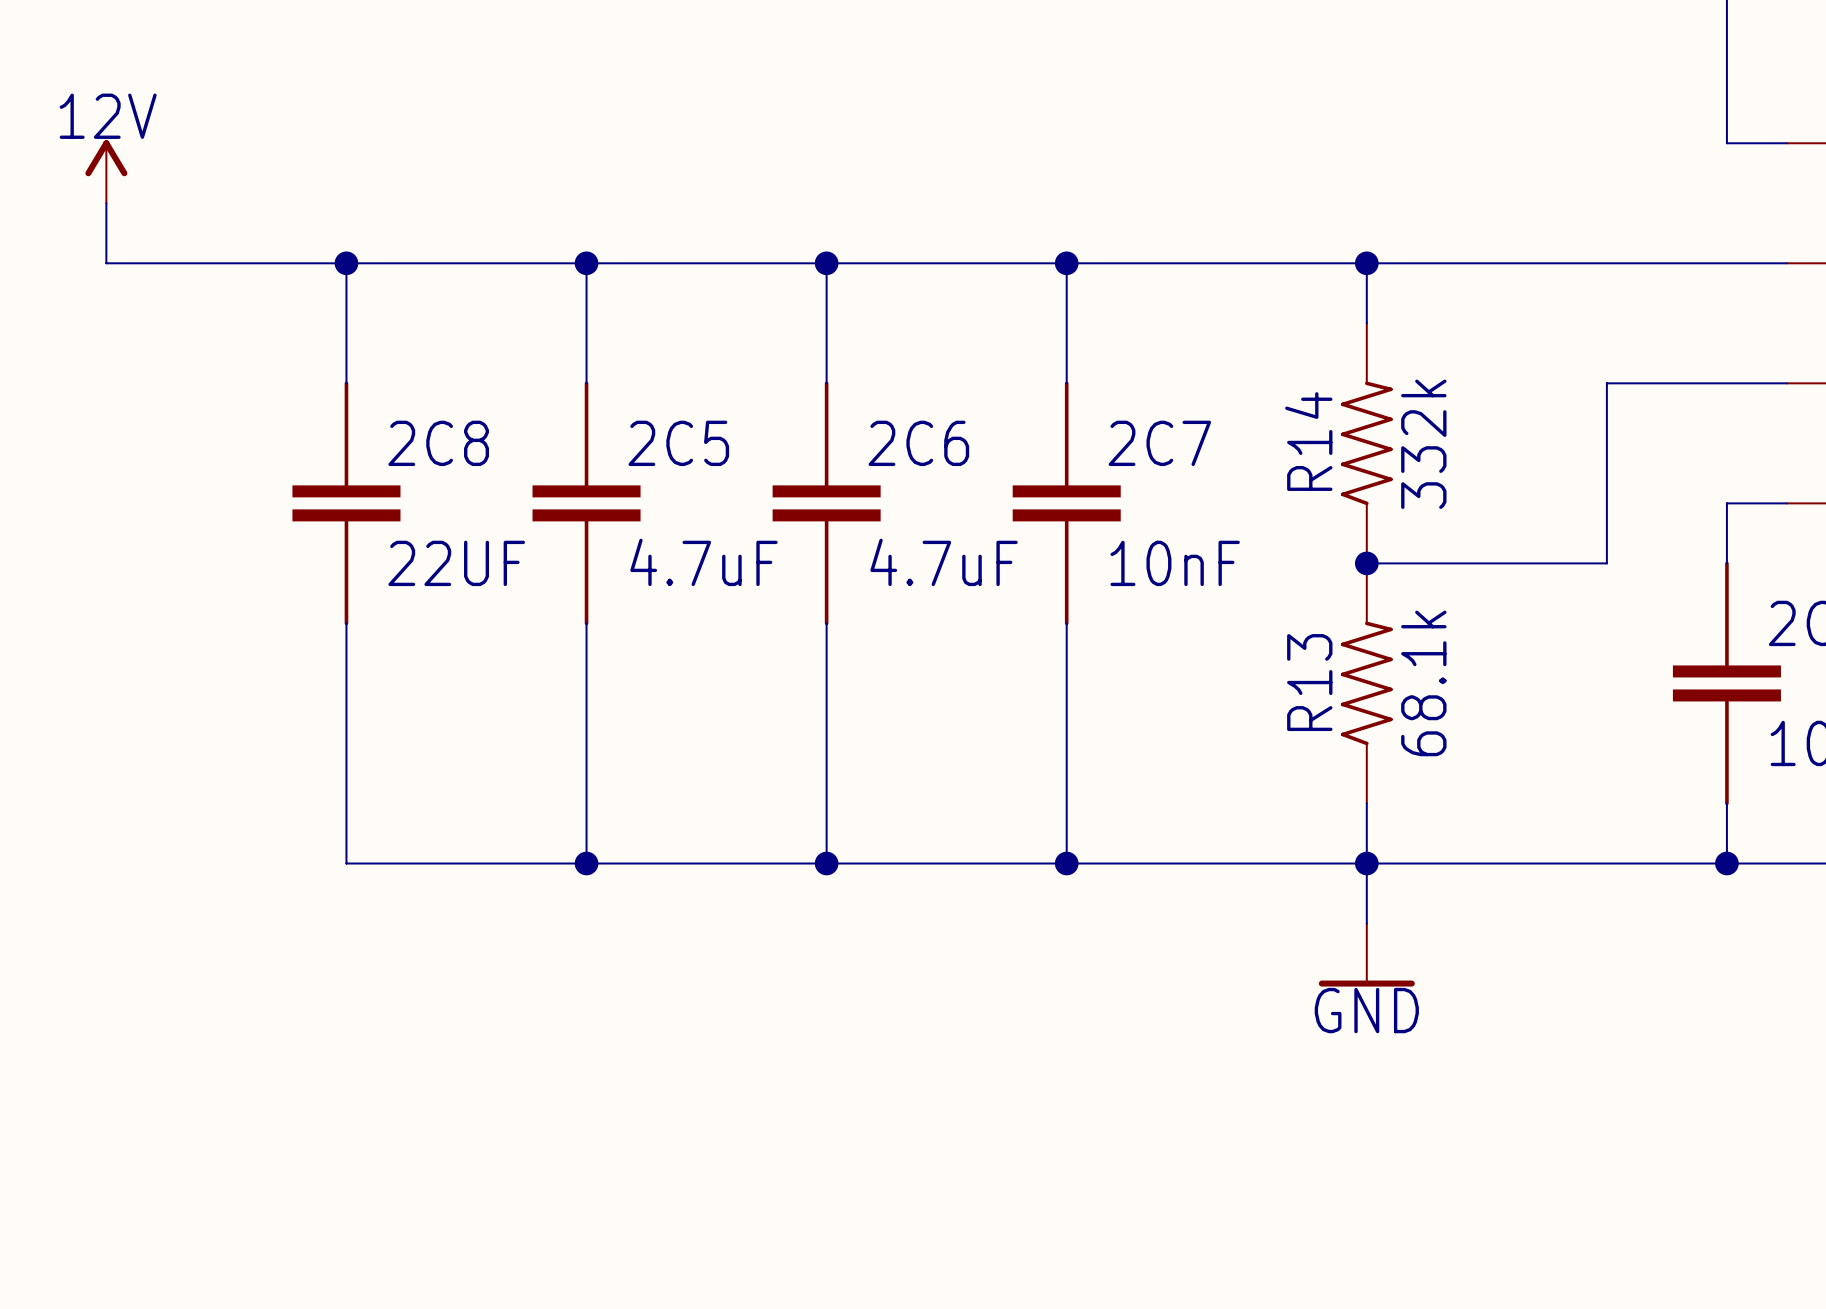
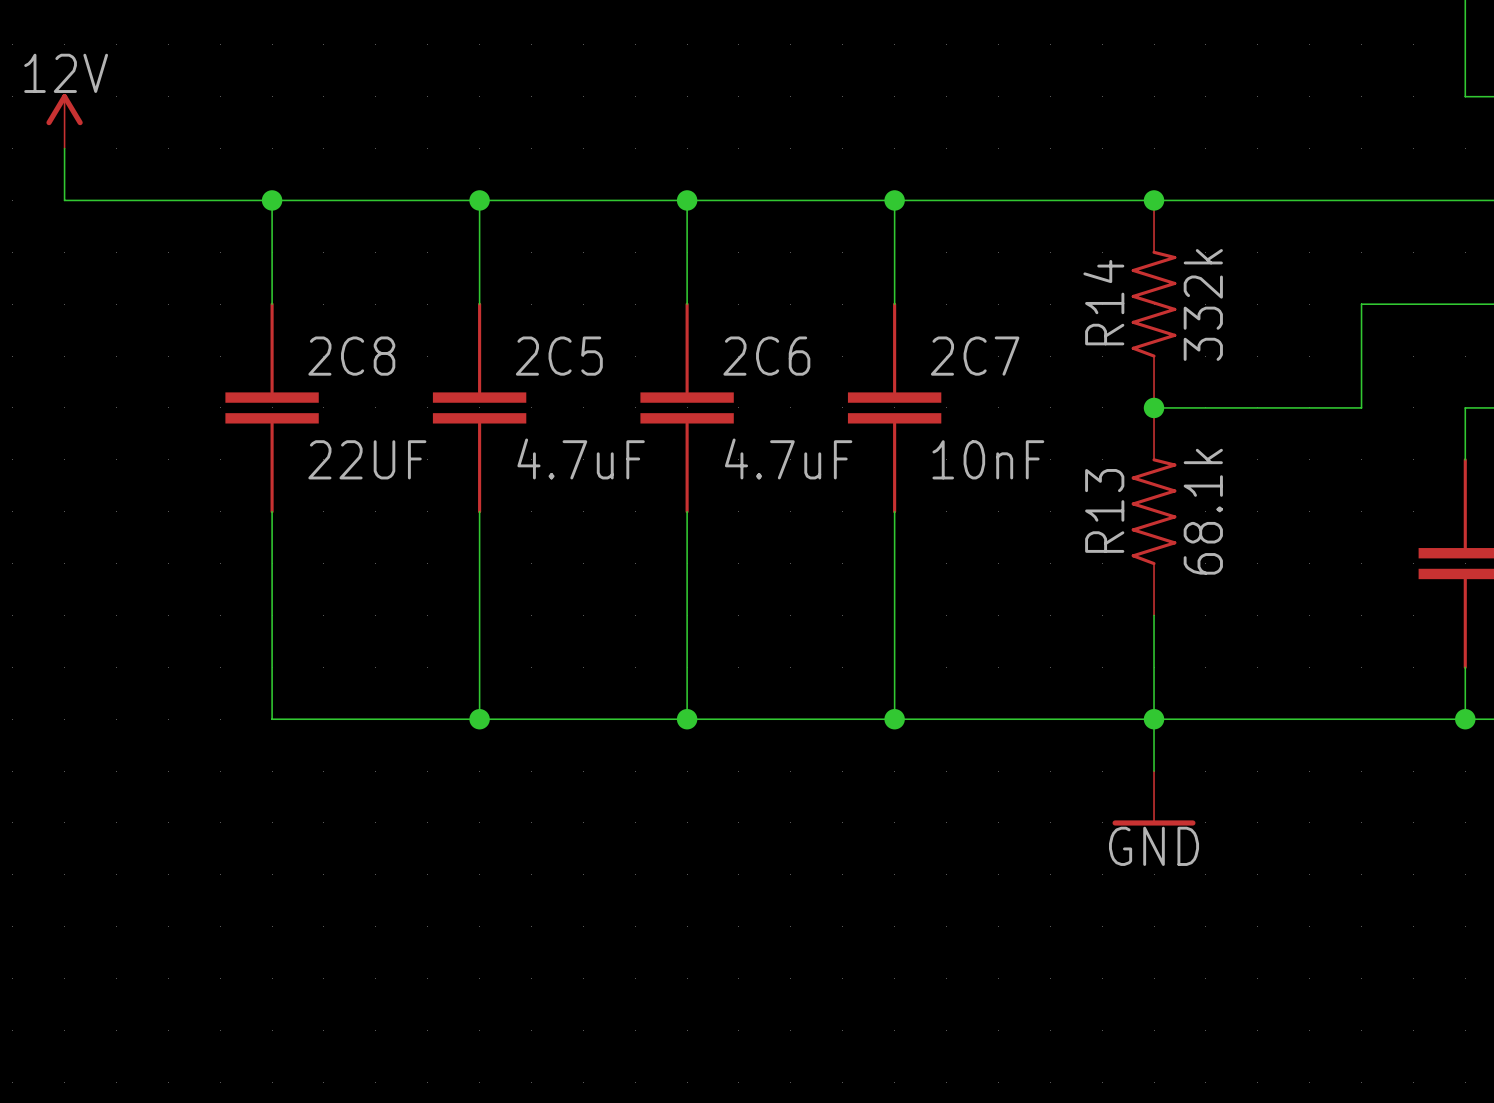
R14 position: (1366, 443) -> (1154, 304)
wire: (1606, 503) (1606, 563) (1366, 563) -> (1361, 407) (1154, 407)
junction position: (1366, 563) -> (1154, 407)
R13 position: (1366, 683) -> (1154, 511)

